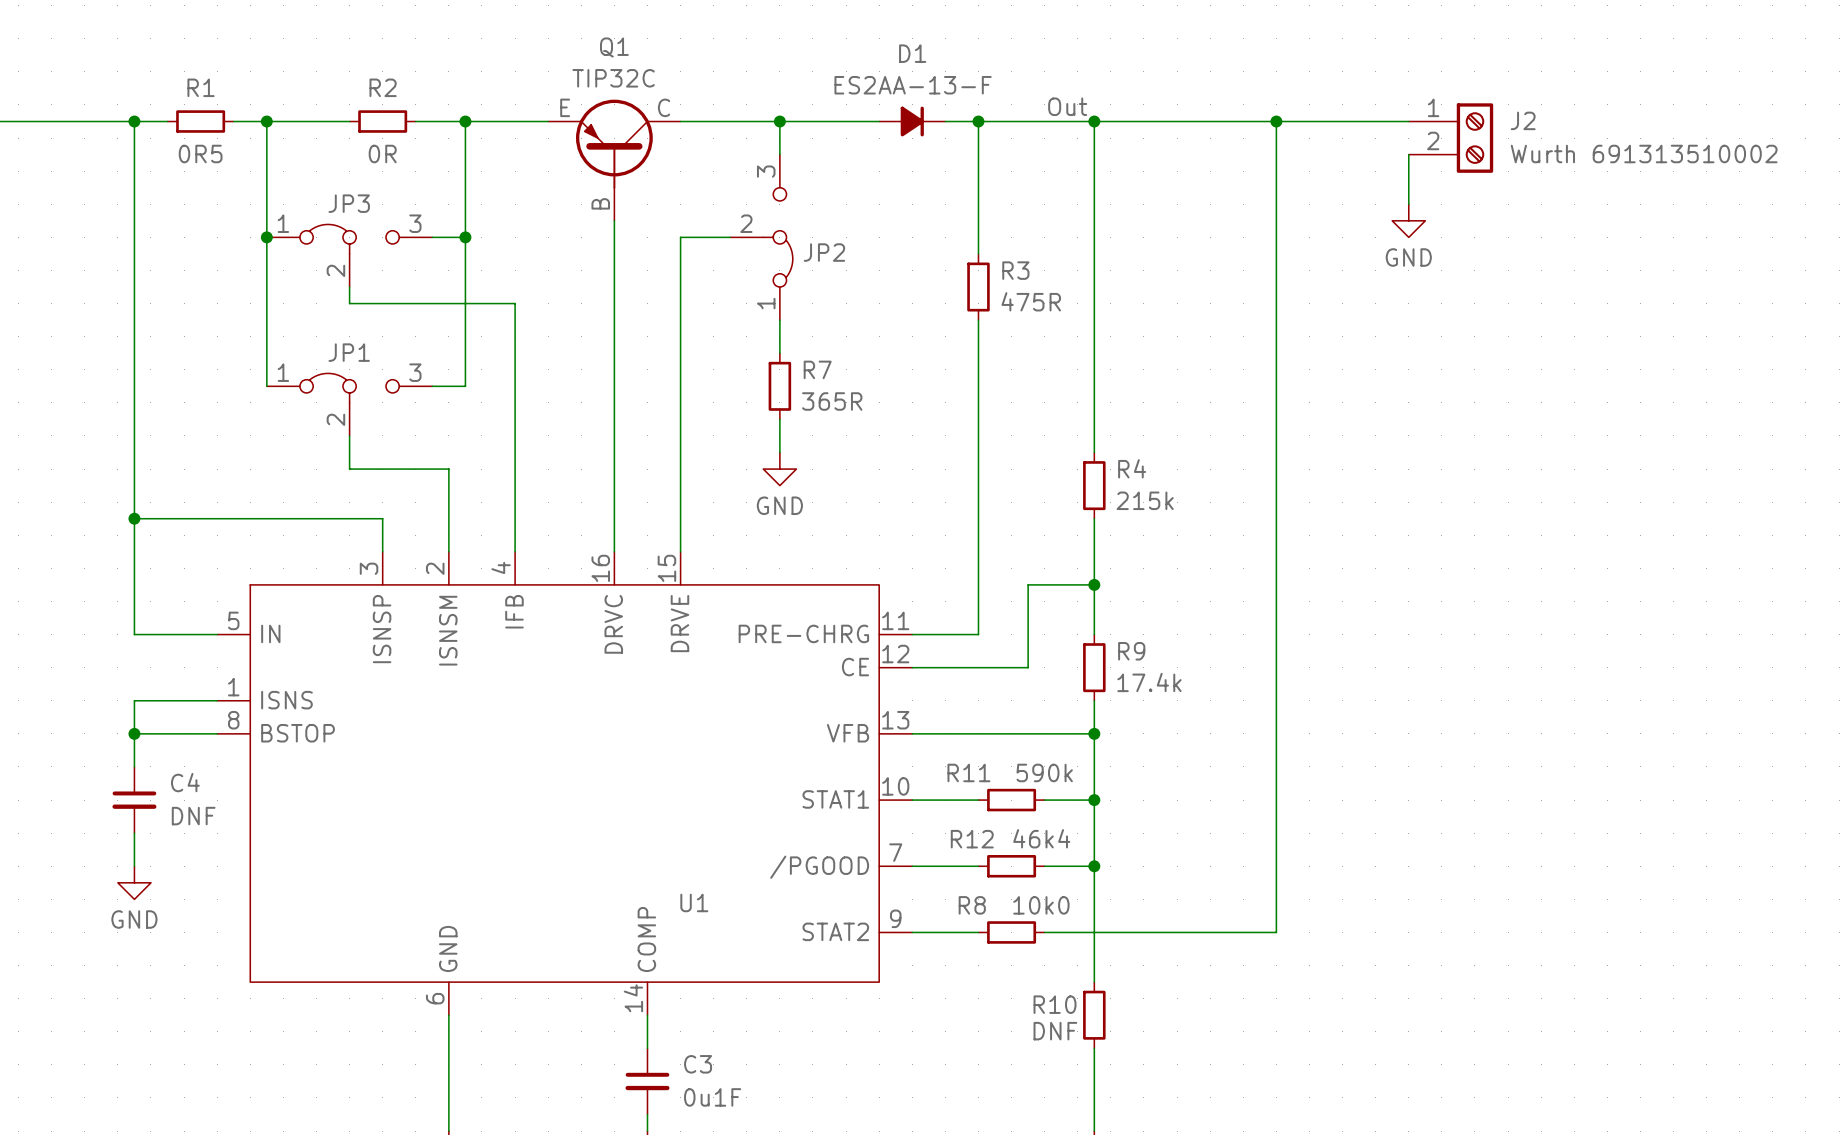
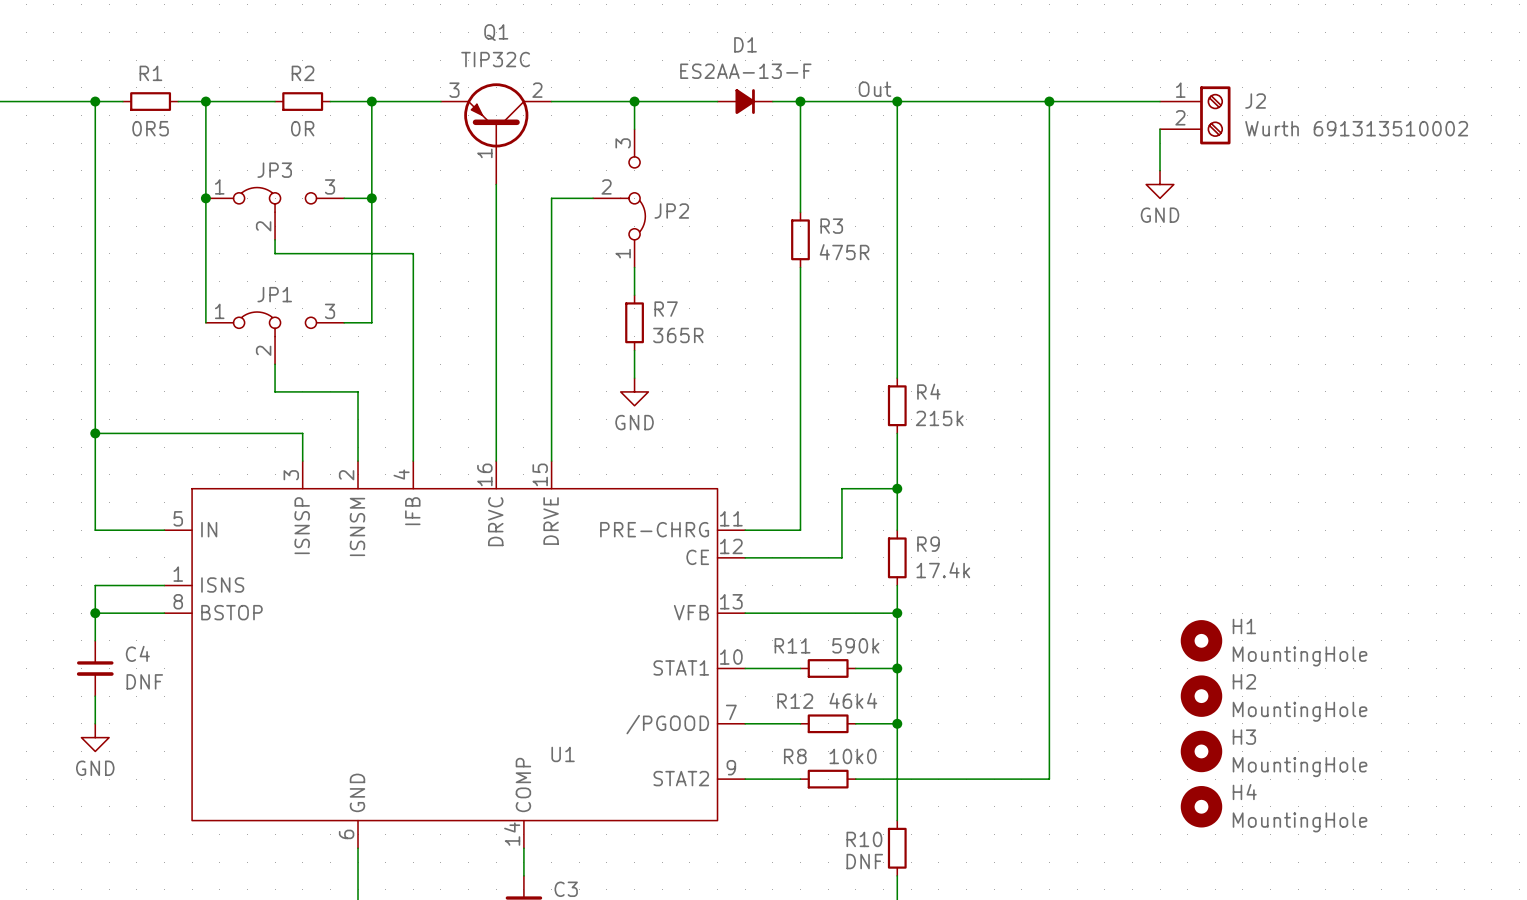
Q1 symbol: [548, 99, 681, 221] -> [440, 83, 552, 185]
H1: none -> MountingHole (1201, 640)
H2: none -> MountingHole (1201, 696)
H3: none -> MountingHole (1201, 751)
H4: none -> MountingHole (1201, 806)

